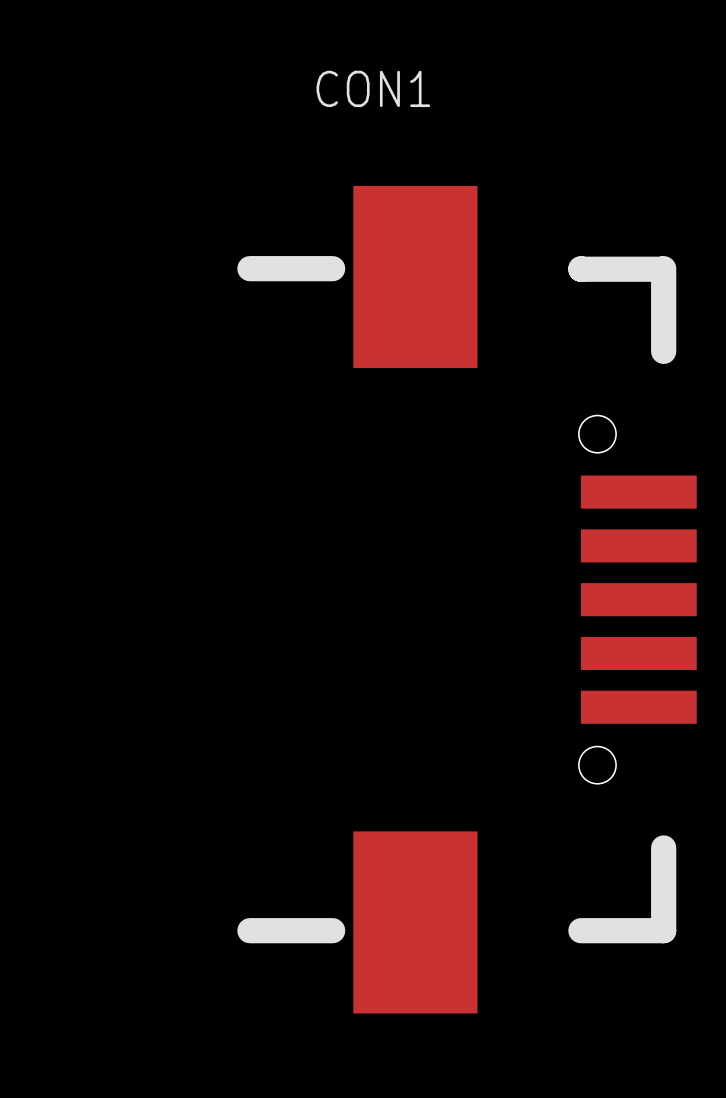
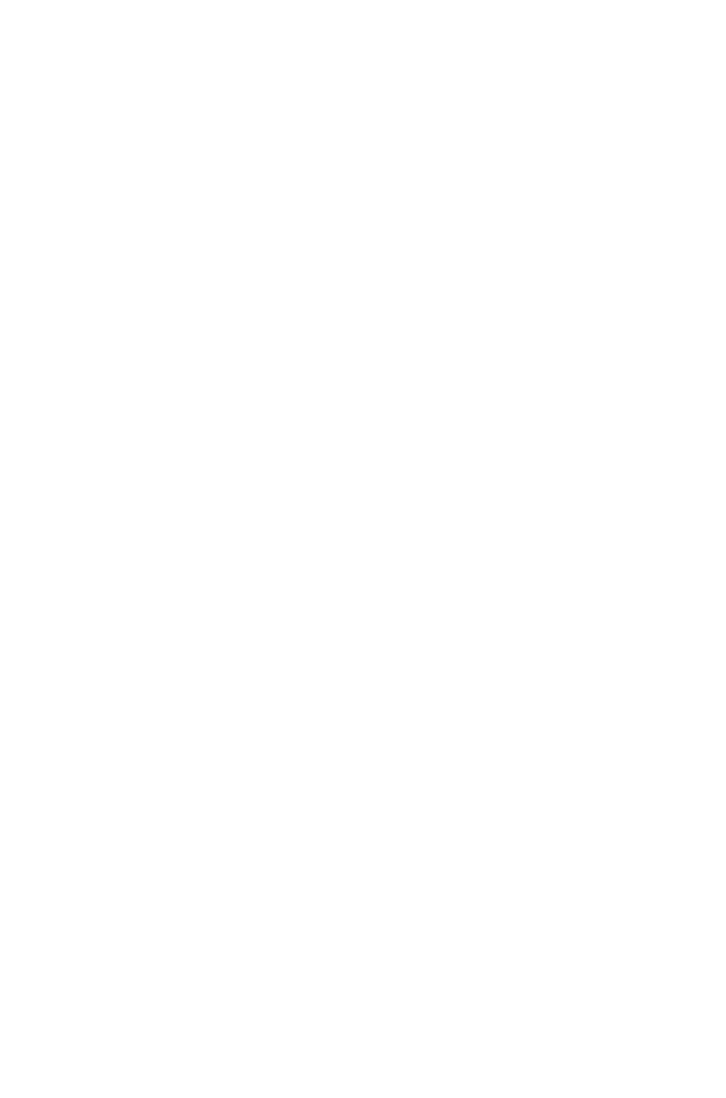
CON1: (467, 599) -> none

